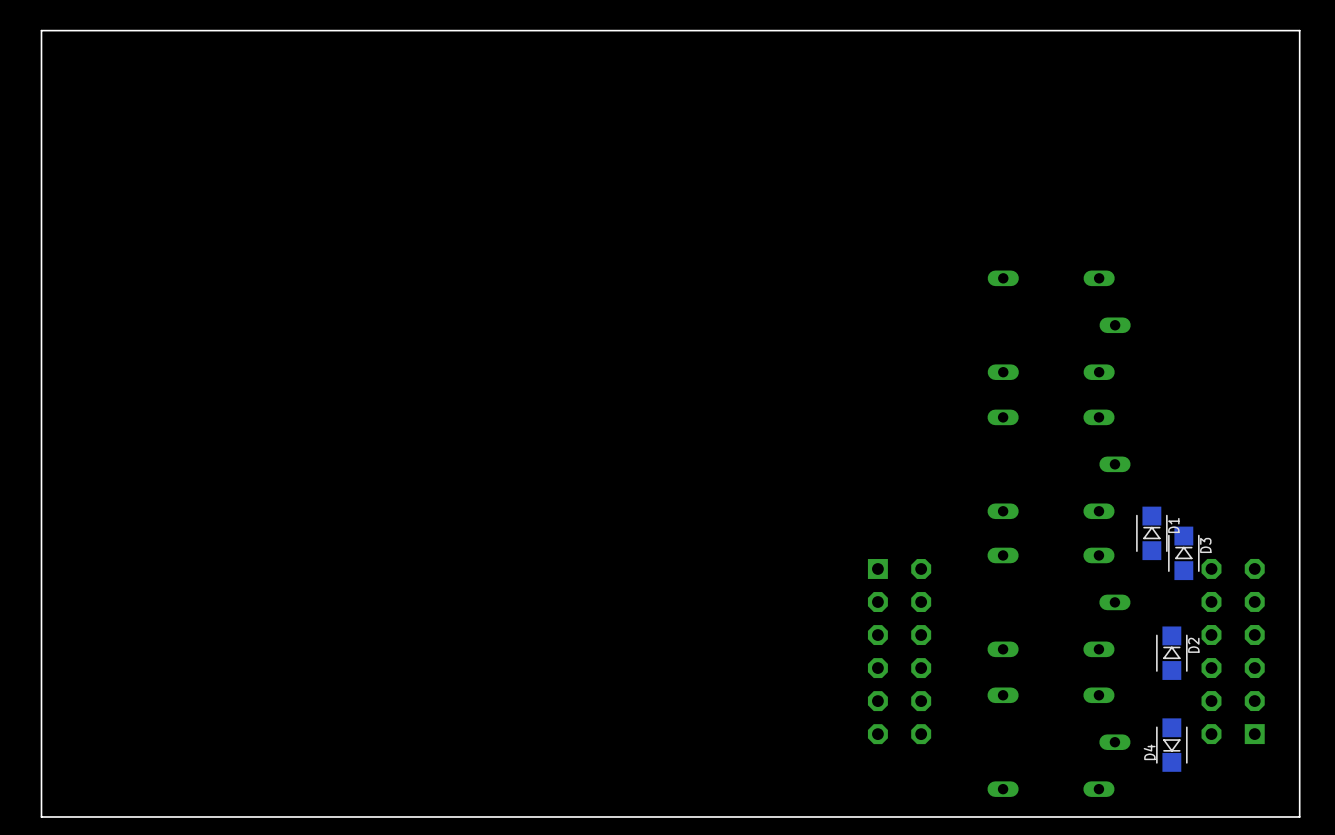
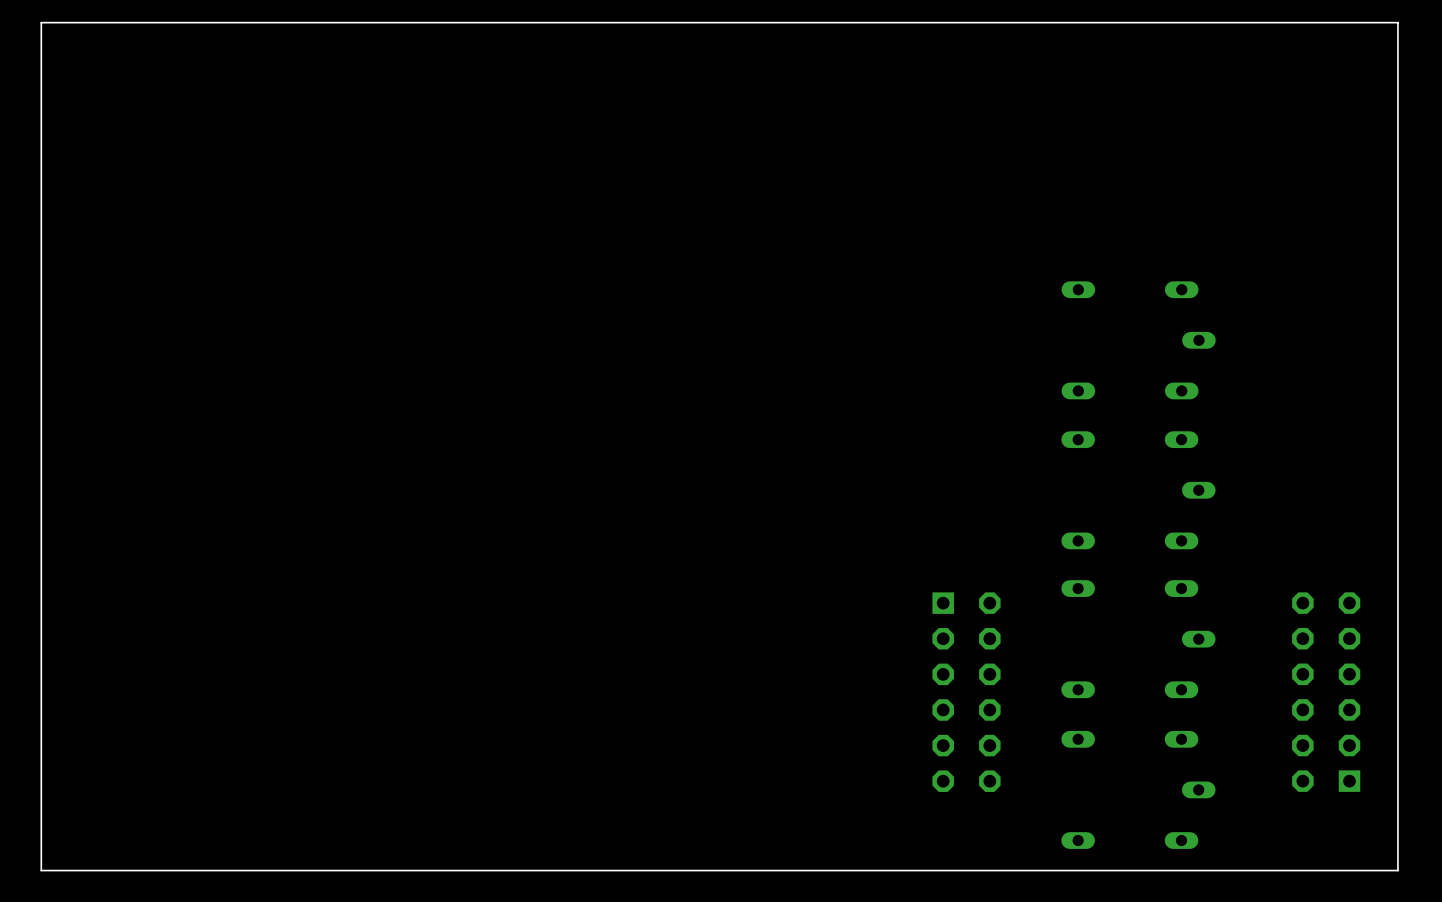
D1: (1151, 533) -> none
D3: (1183, 553) -> none
D2: (1171, 653) -> none
D4: (1171, 745) -> none

